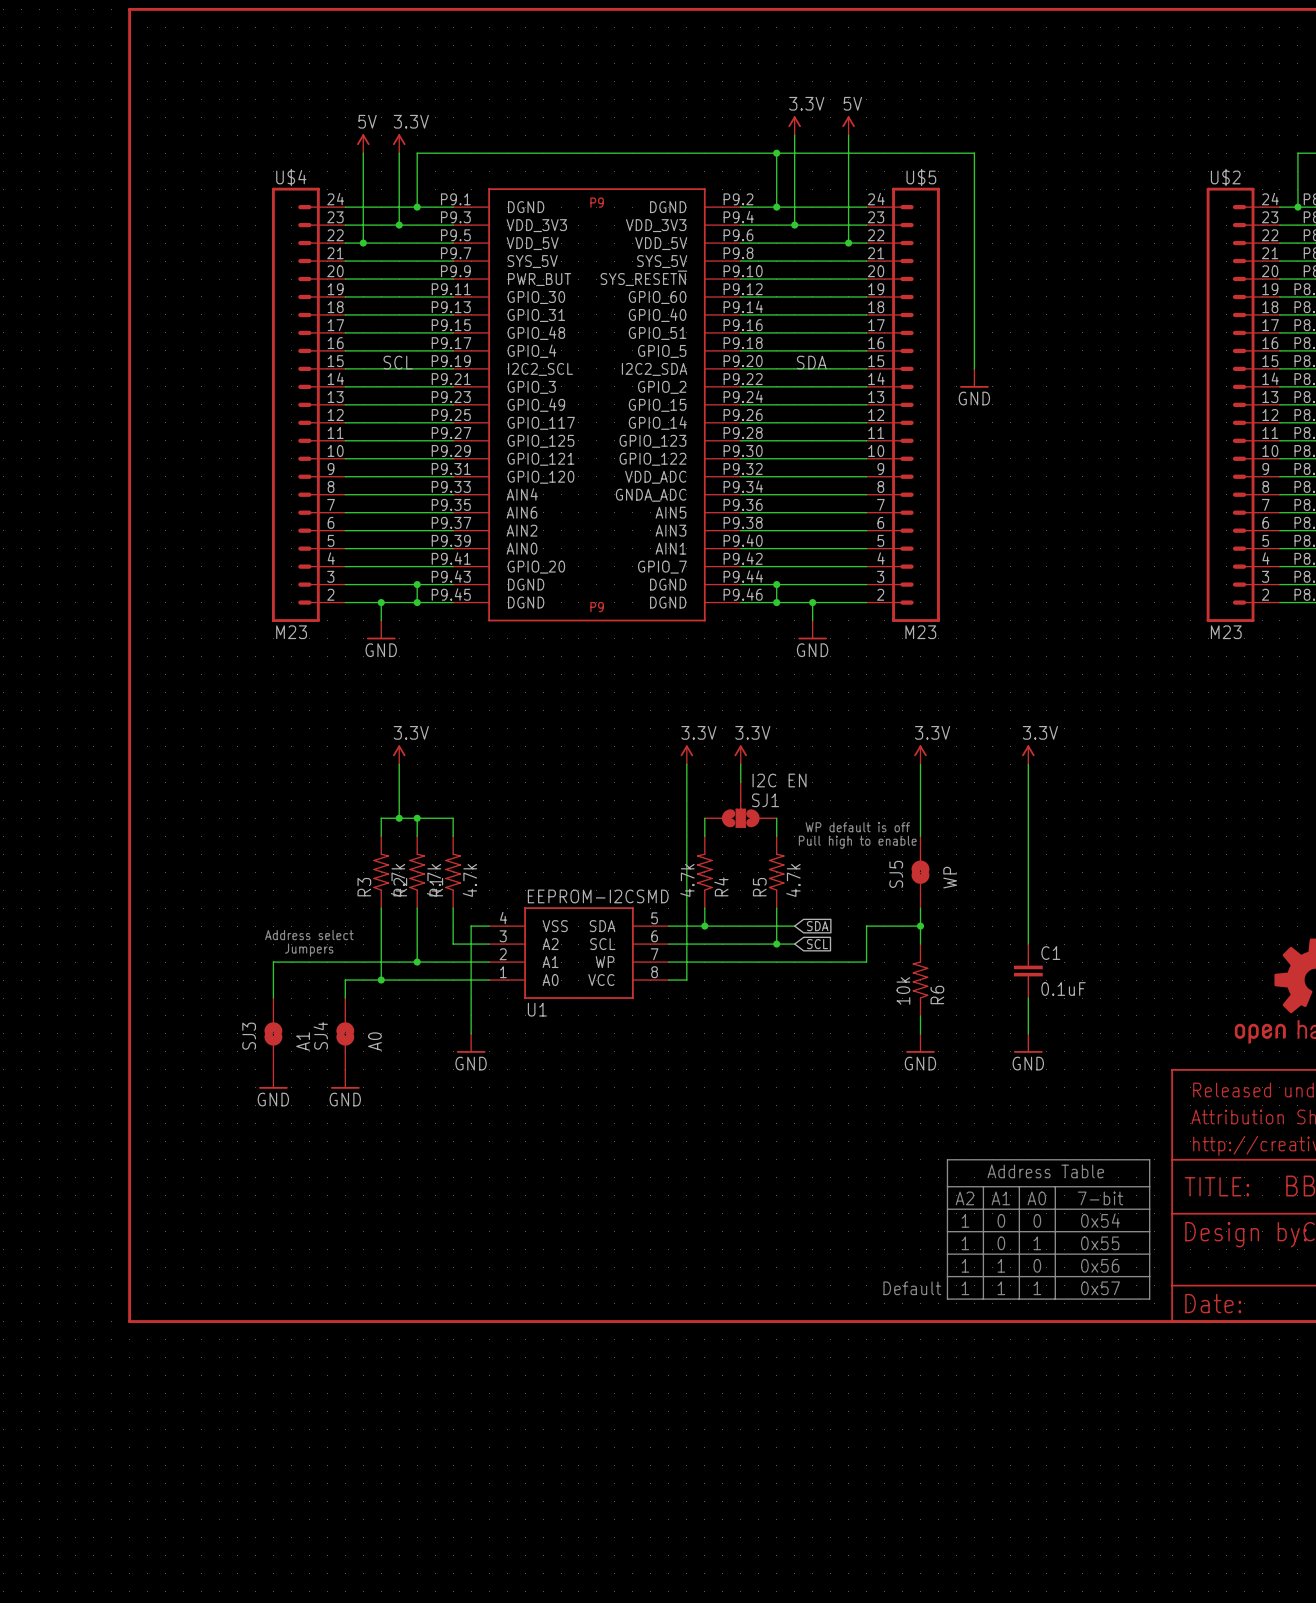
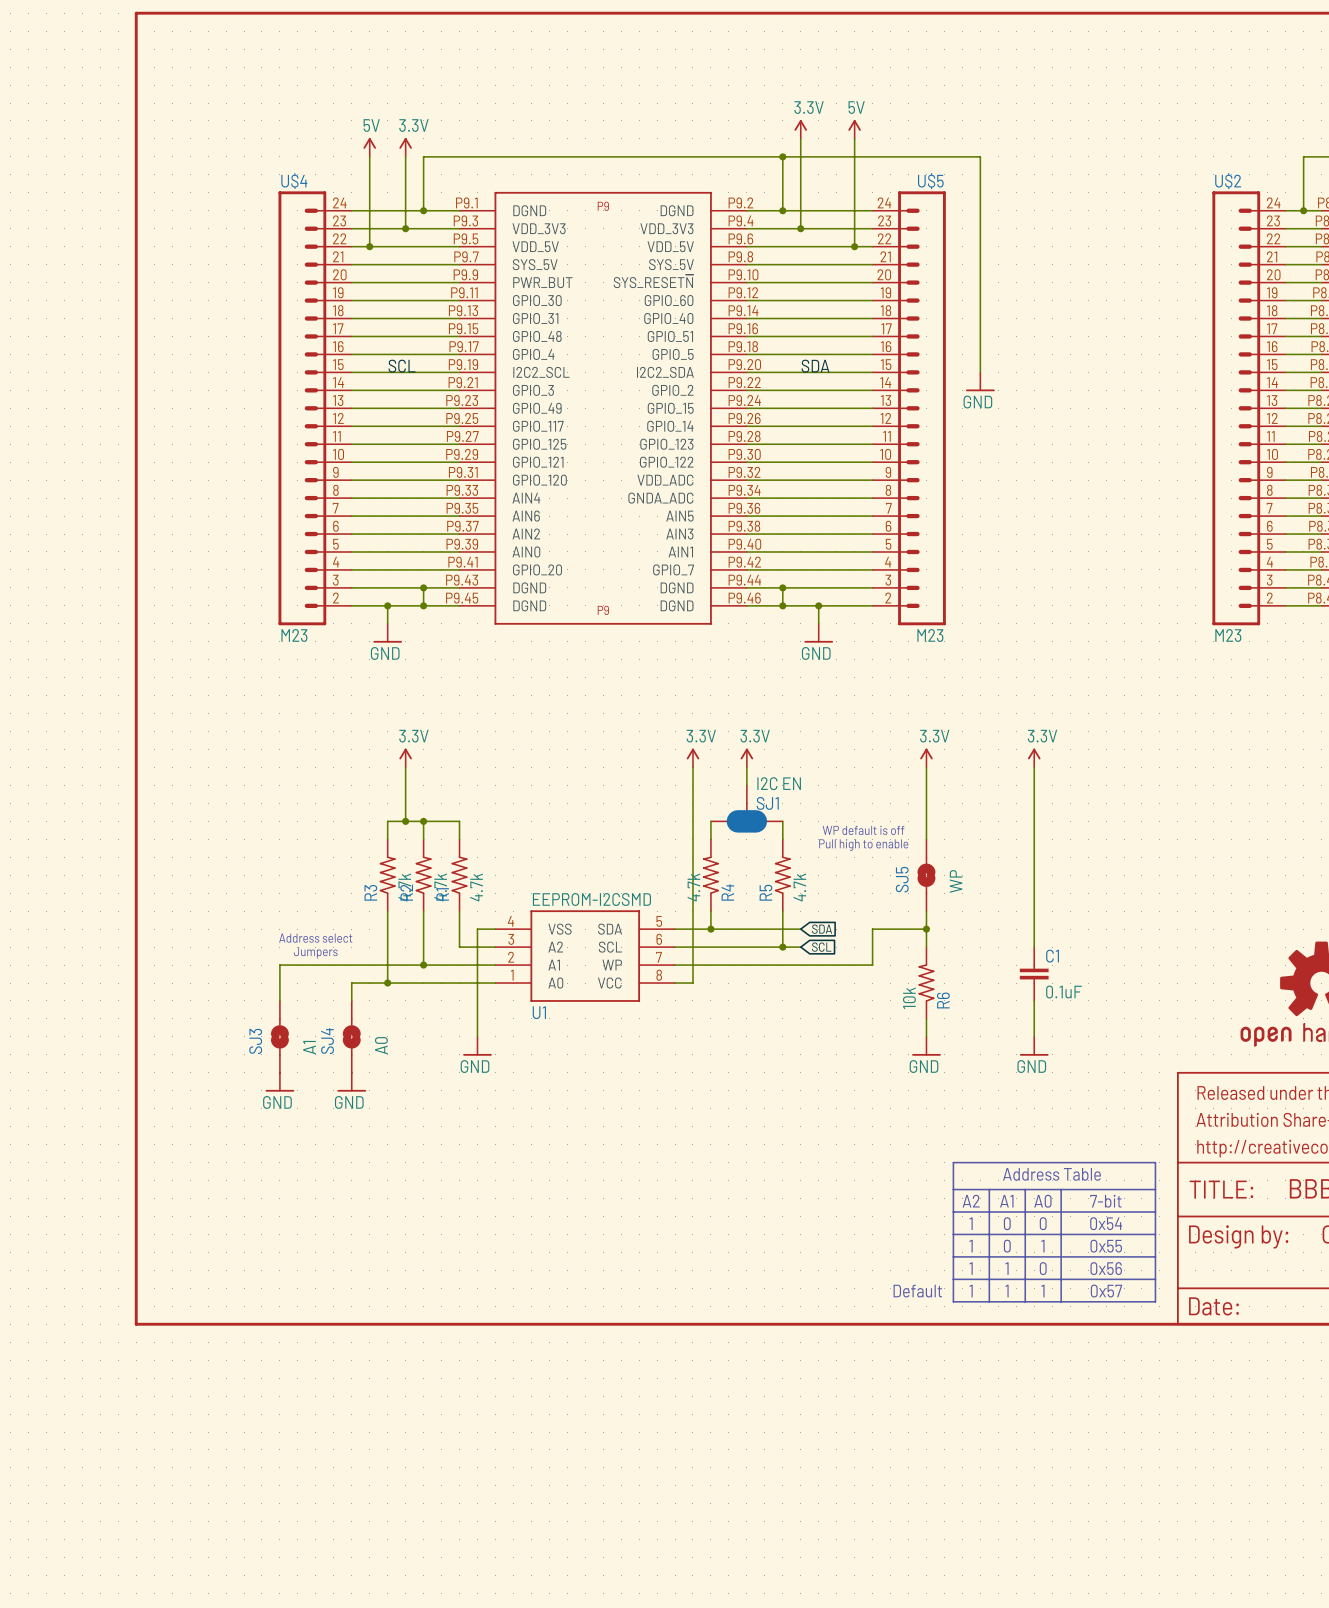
SJ1 symbol: [704, 782, 777, 828] -> [710, 785, 783, 833]

